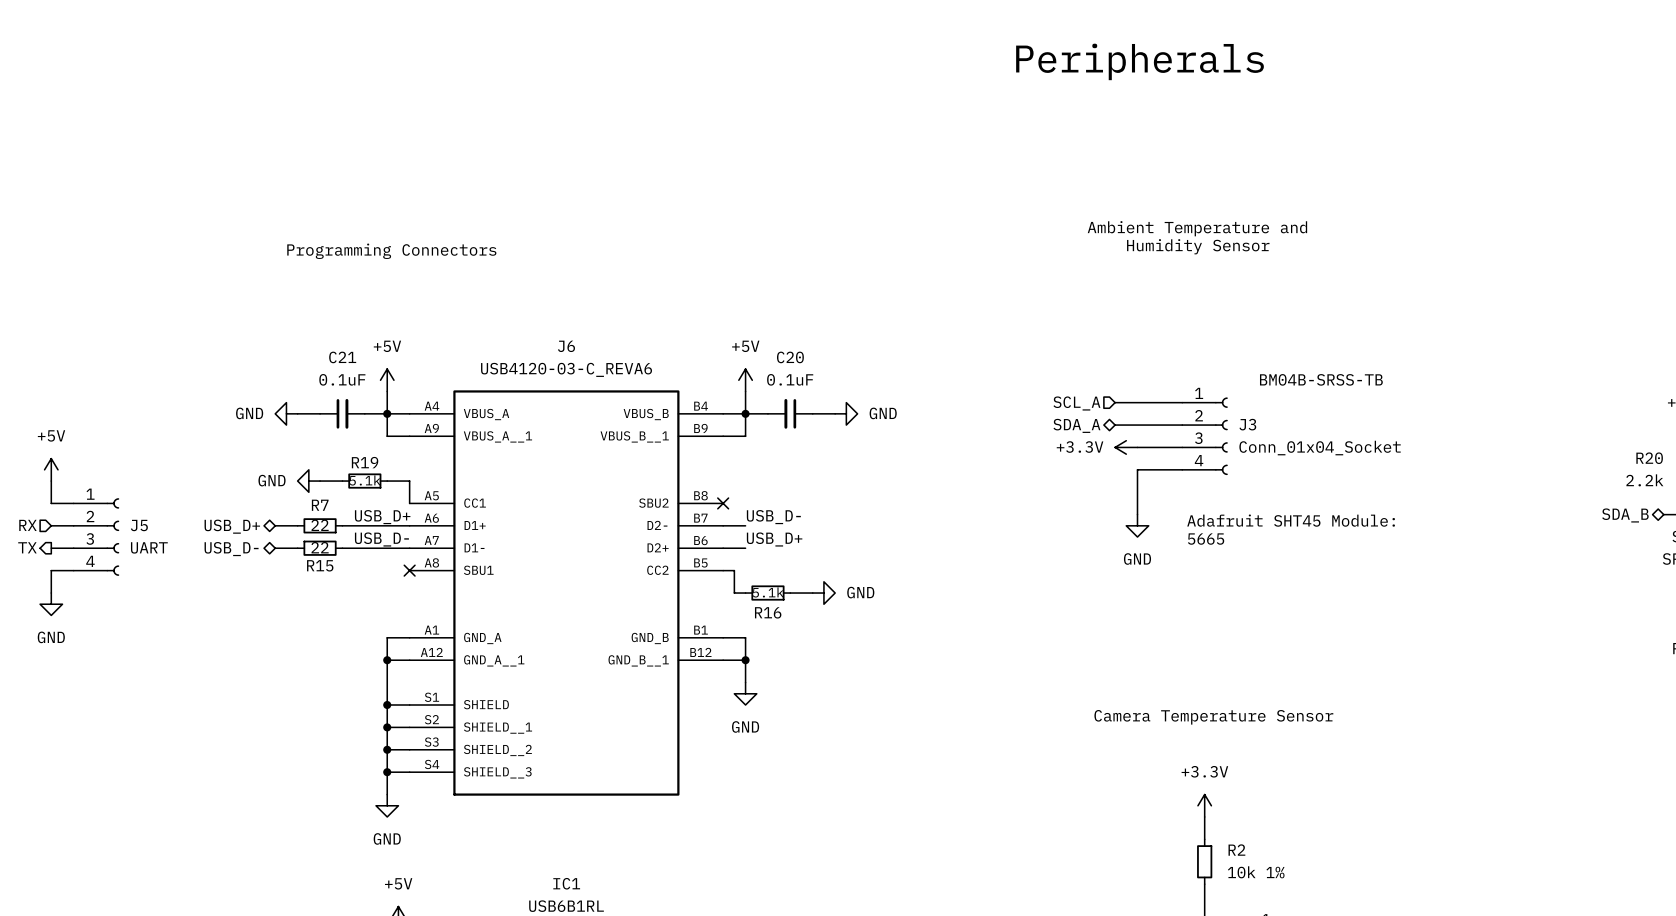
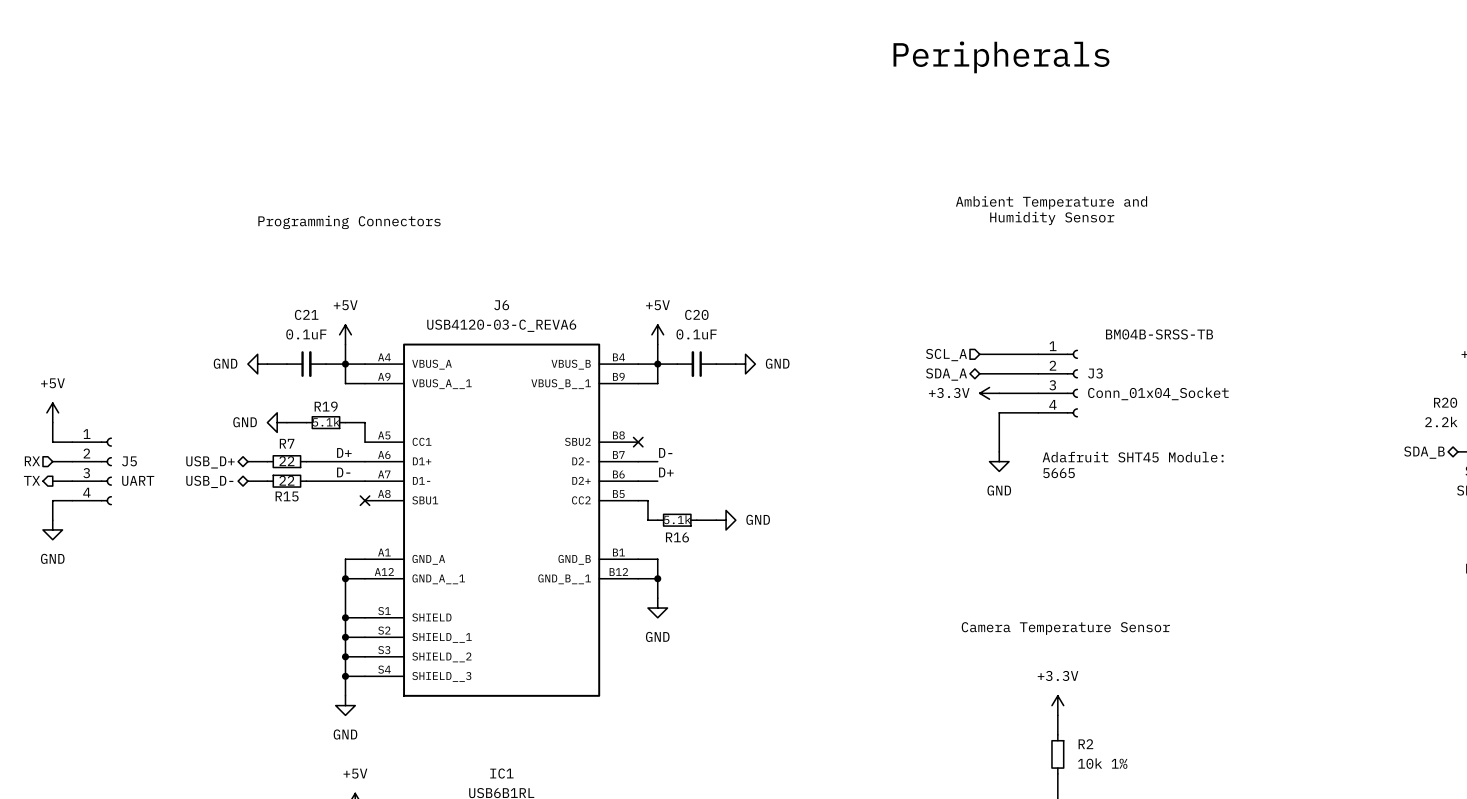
label: none -> D+ (344, 452)
label: USB_D+ (382, 517) -> none
label: USB_D- (773, 517) -> D- (665, 452)
label: none -> D- (343, 472)
label: USB_D- (381, 539) -> none
label: USB_D+ (774, 539) -> D+ (666, 472)

